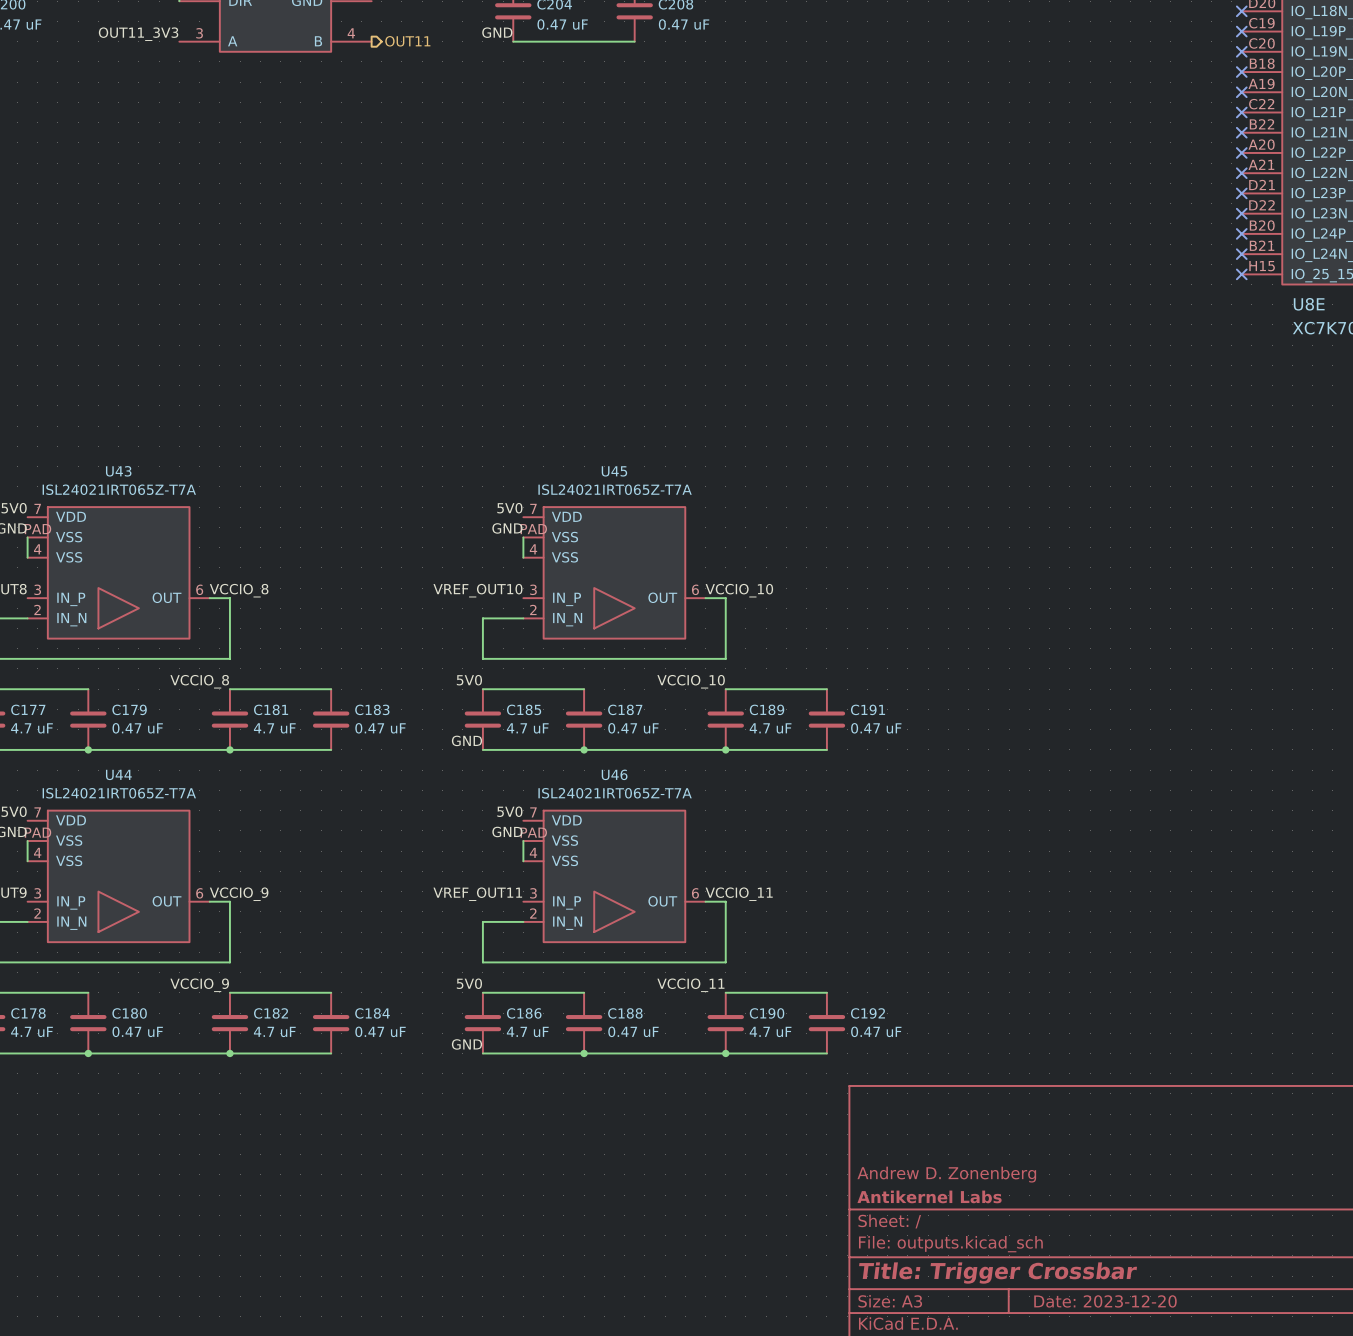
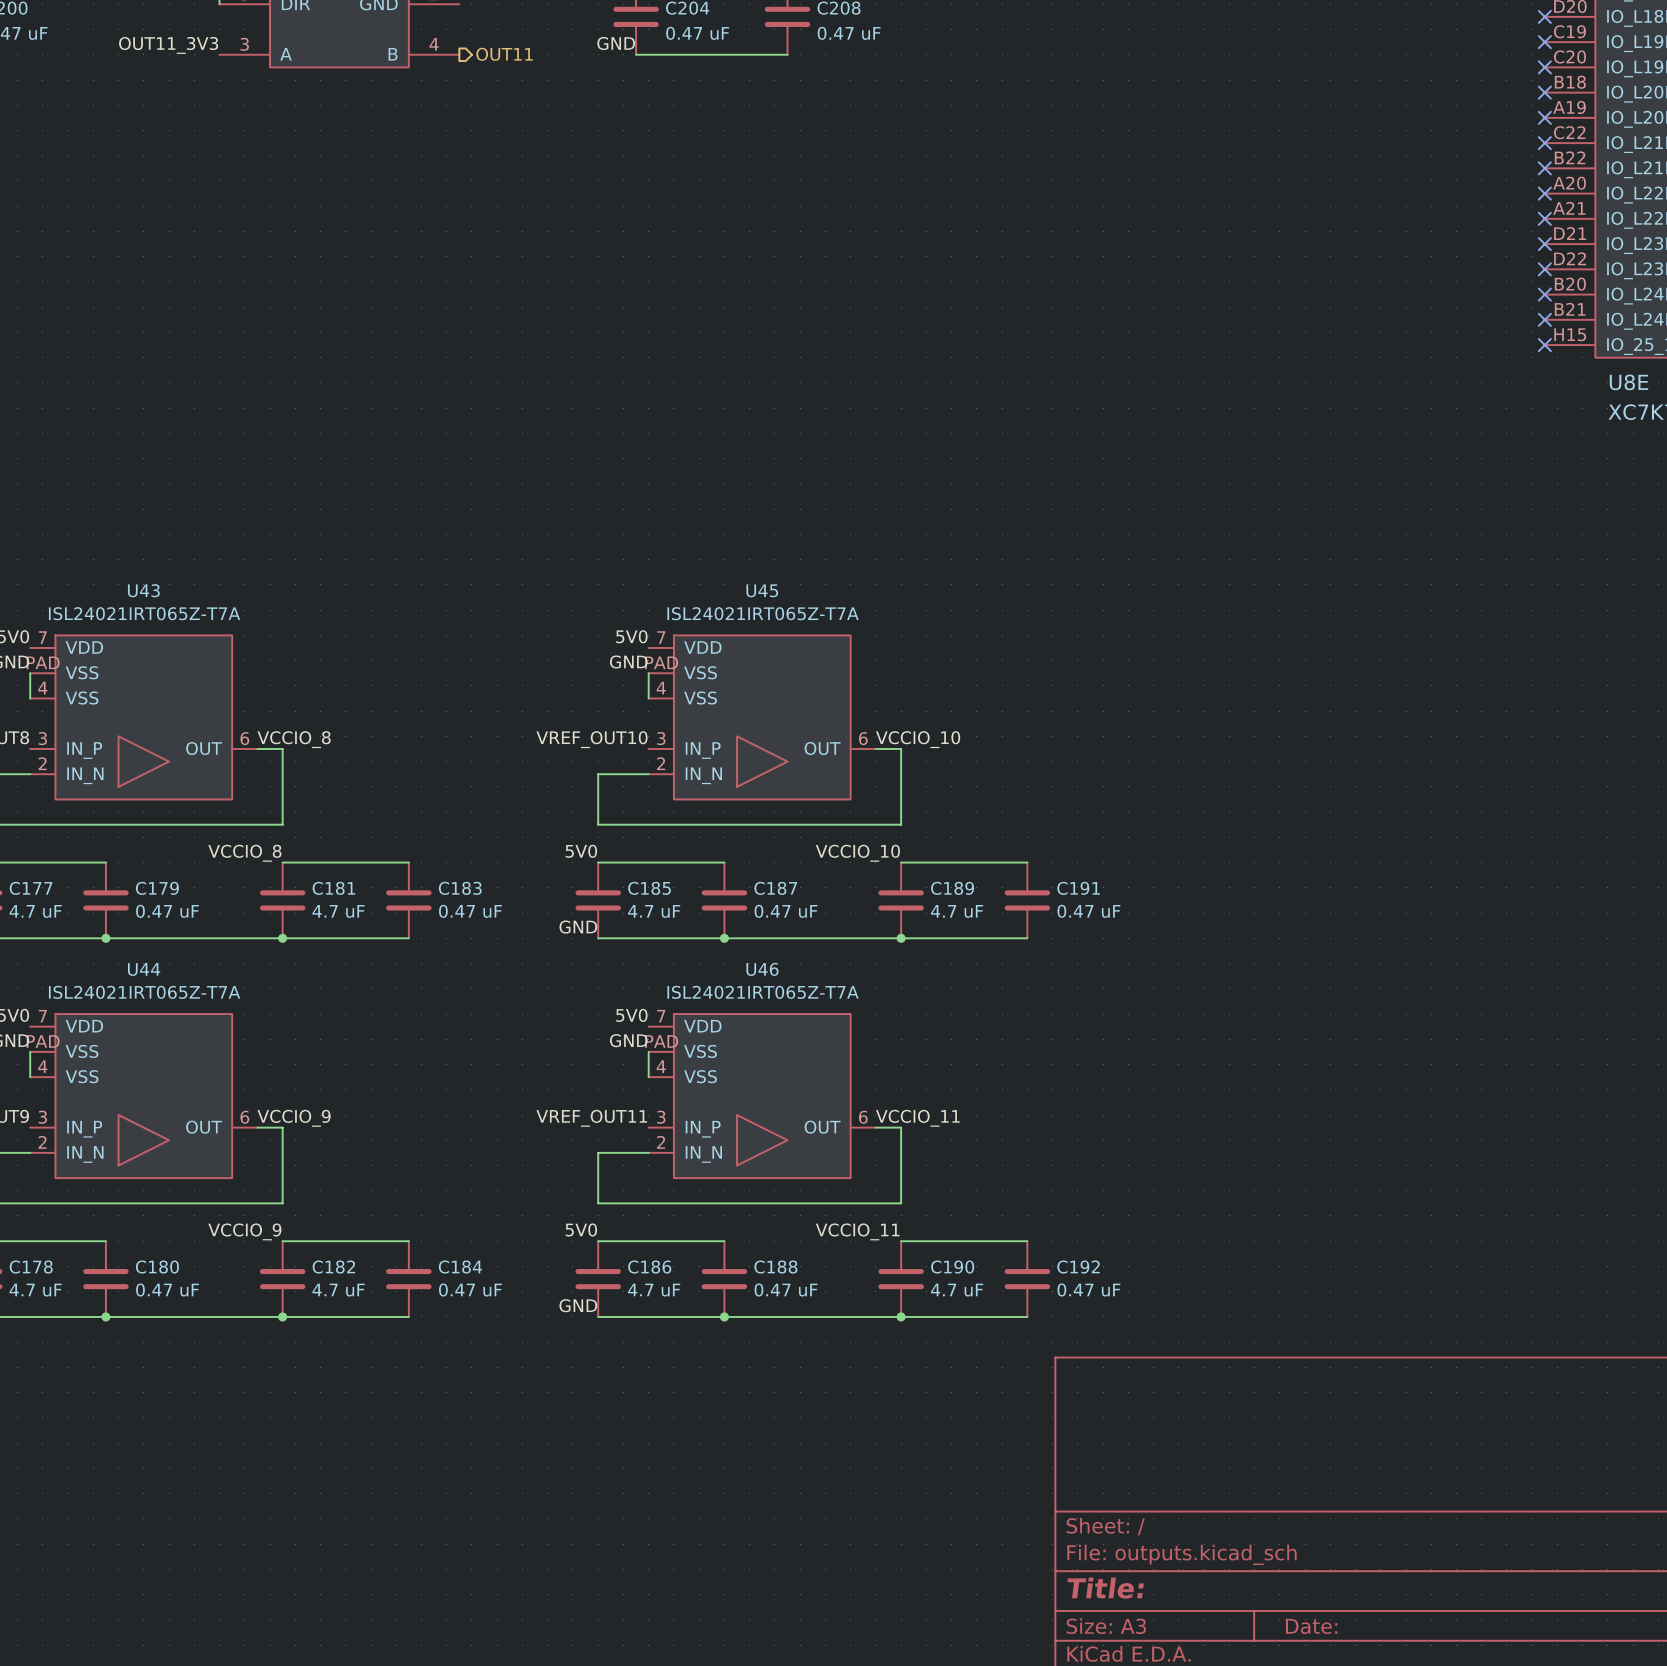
title block: Andrew D. Zonenberg (946, 1174) -> none
title block: Antikernel Labs (929, 1196) -> none
title block: Title: Trigger Crossbar (998, 1273) -> Title: (1105, 1588)
title block: Date: 2023-12-20 (1105, 1301) -> Date: (1311, 1626)

